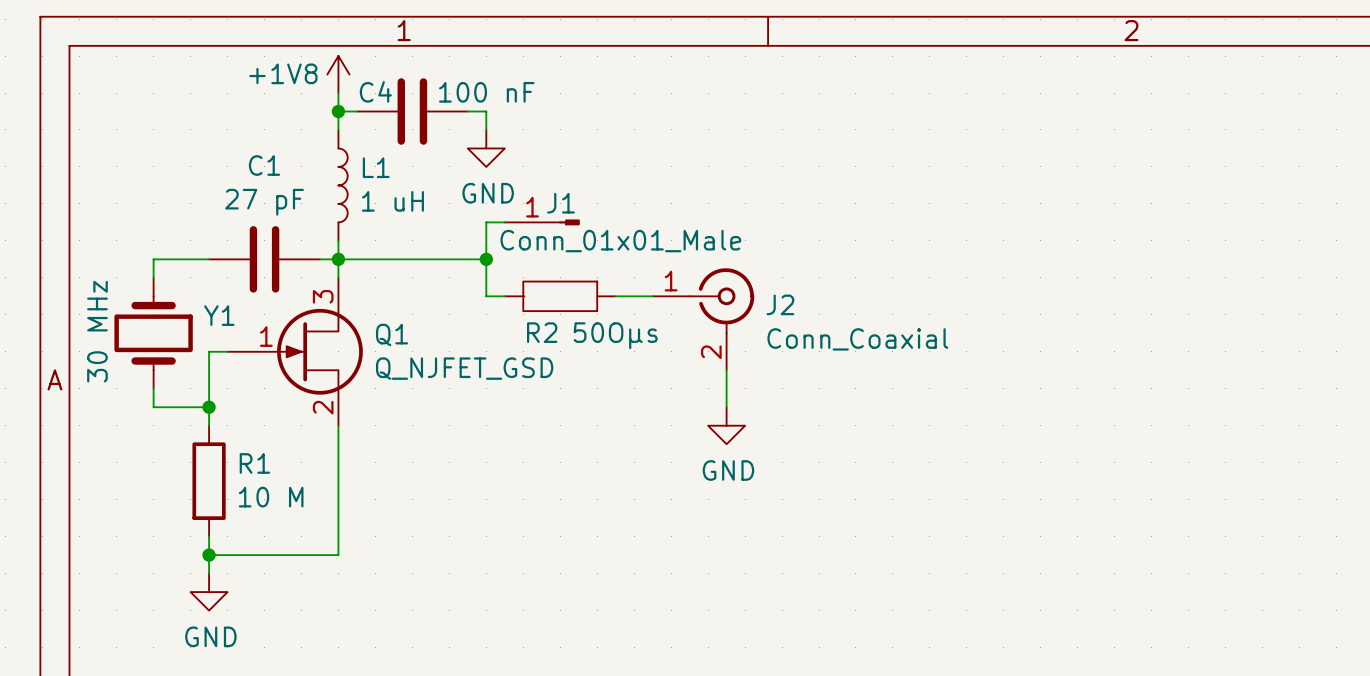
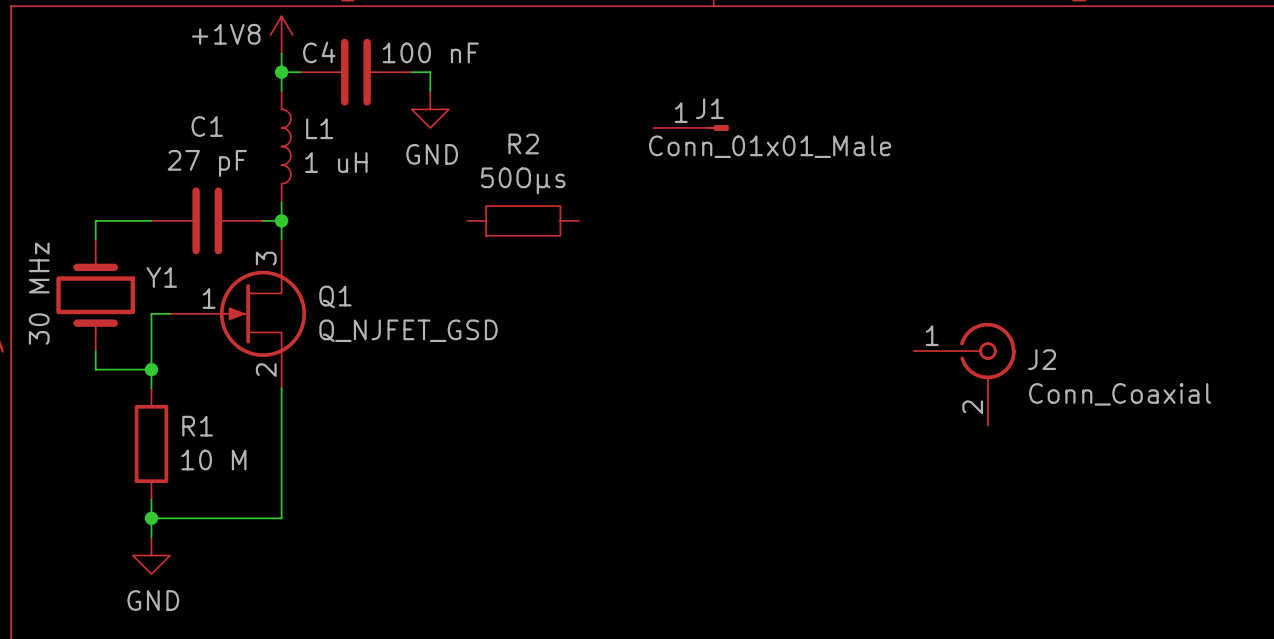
wire: (504, 222) (486, 222) (486, 296) (504, 296) -> none
J1 position: (542, 222) -> (691, 127)
wire: (338, 259) (486, 259) -> none
junction: (486, 259) -> none
R2 rotation: 0° (560, 296) -> 180° (523, 220)
wire: (615, 296) (652, 296) -> none
J2 position: (703, 319) -> (964, 374)
R2 name position: R2 (542, 332) -> R2 (523, 143)
R2 value position: 50Oμs (615, 335) -> 50Oμs (523, 180)
wire: (726, 370) (726, 407) -> none
power symbol: GND (726, 425) -> none

